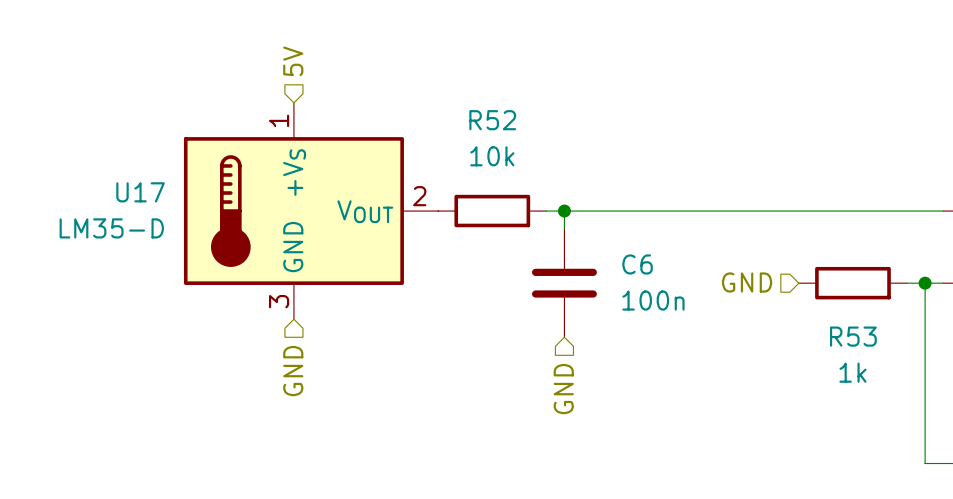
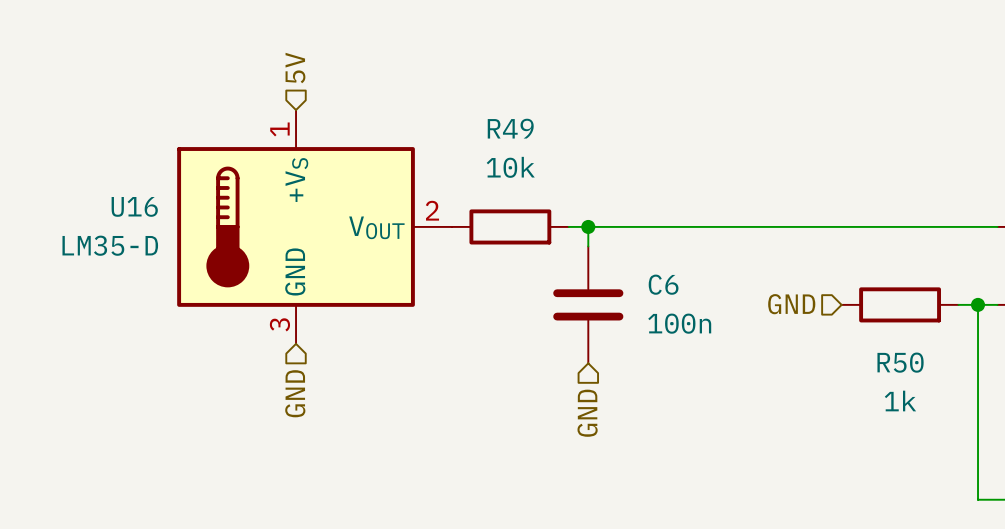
R52 name: R52 (492, 120) -> R49 (510, 128)
U17 name: U17 (140, 192) -> U16 (134, 206)
R53 name: R53 (853, 336) -> R50 (900, 362)

